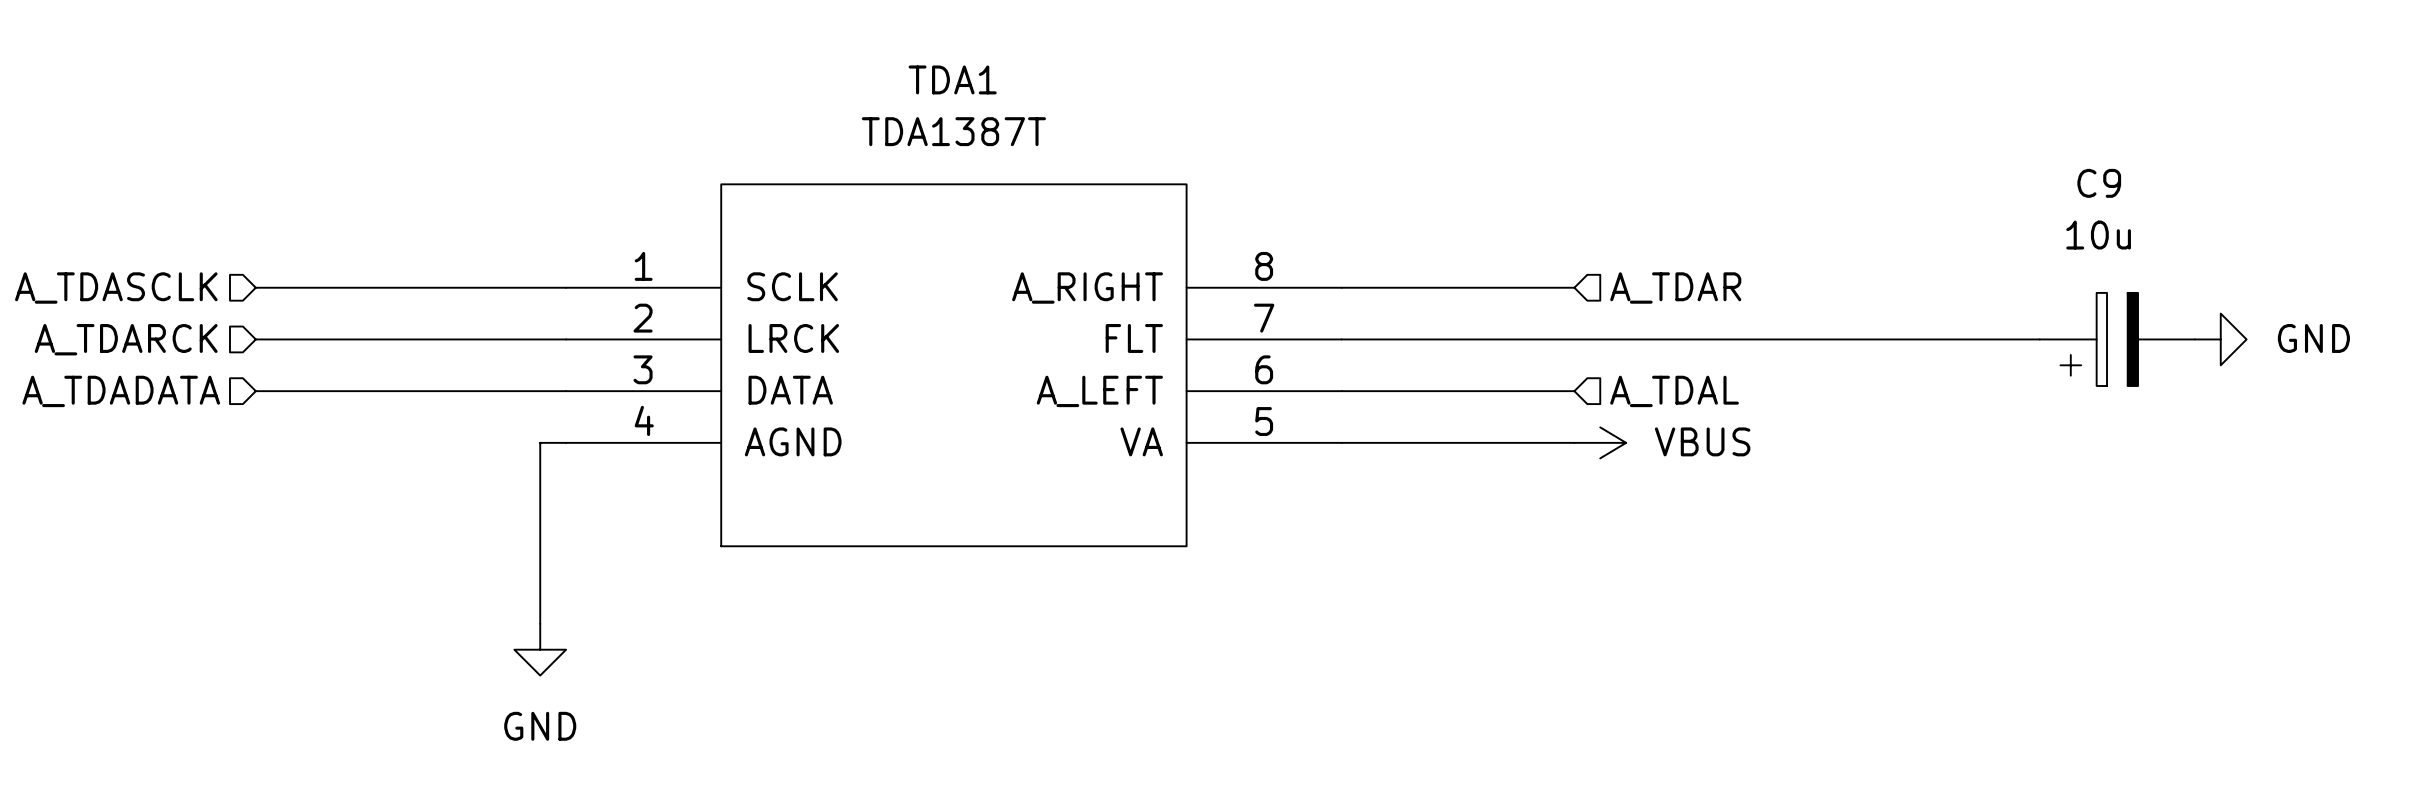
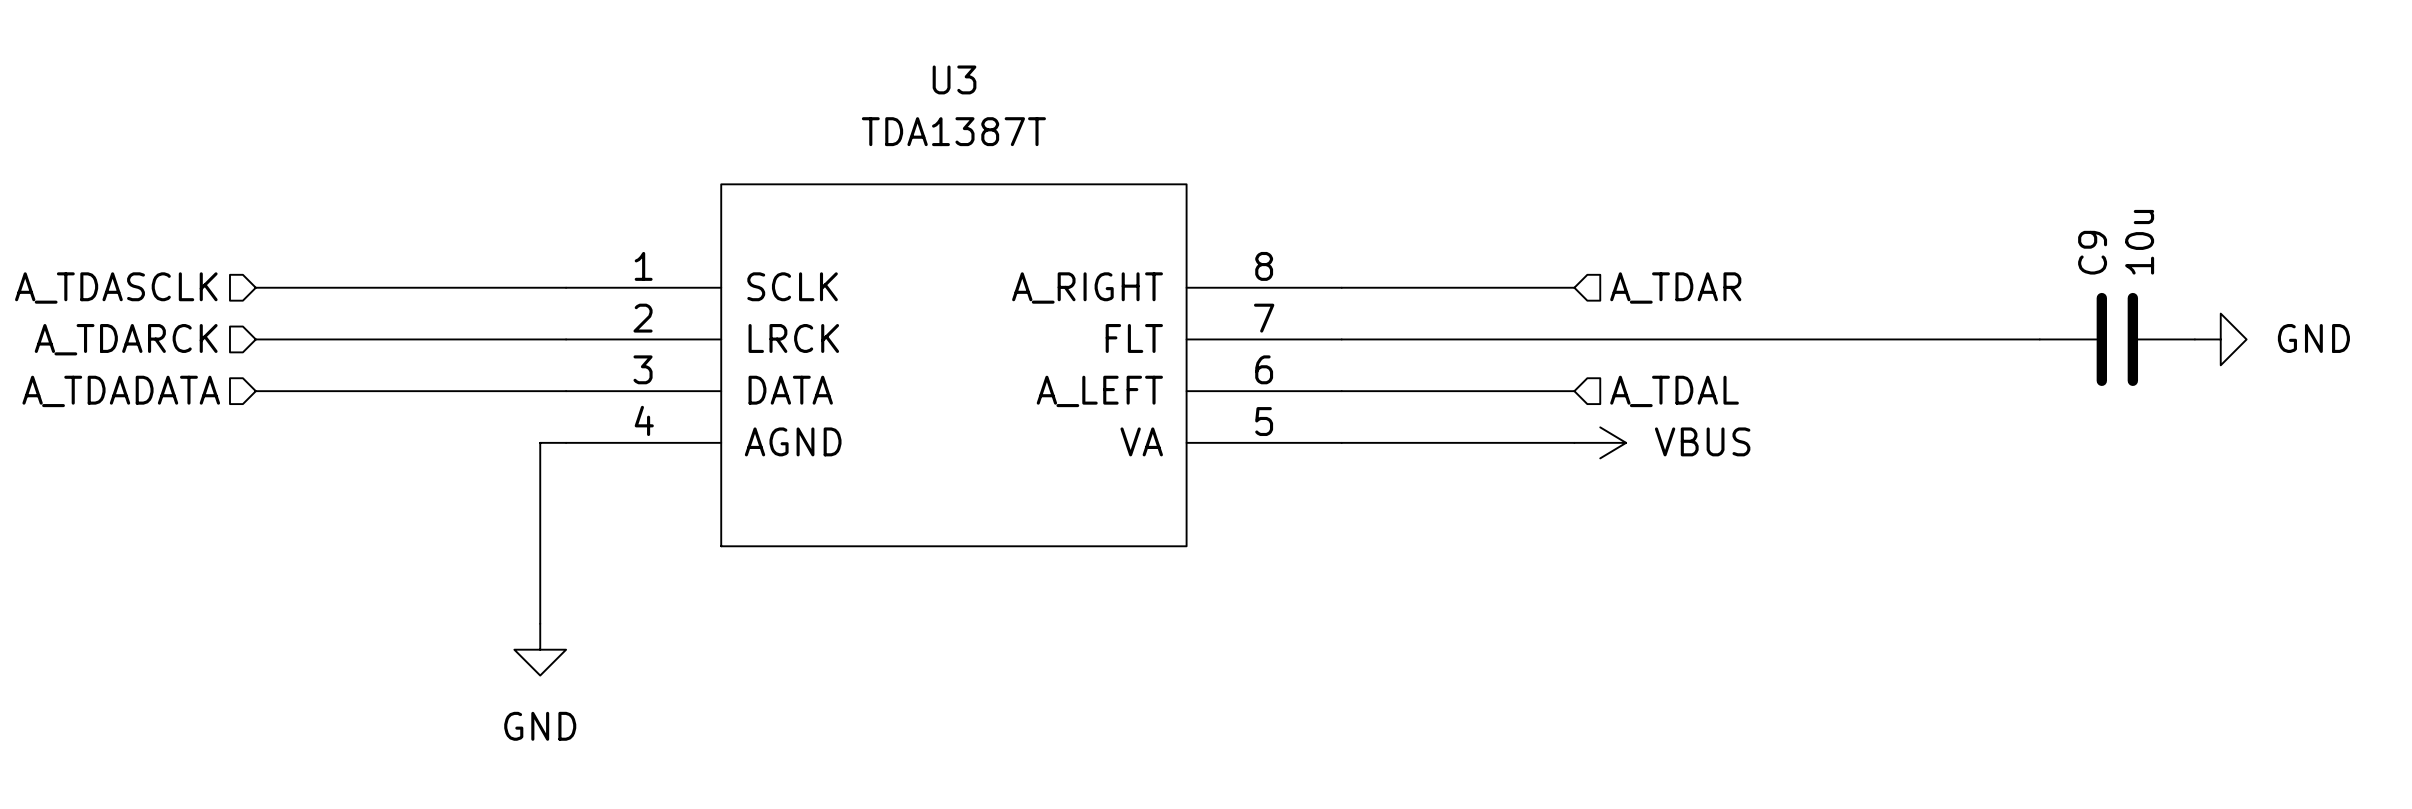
TDA1 name: TDA1 (952, 79) -> U3 (954, 79)
C9 name position: C9 (2099, 183) -> C9 (2092, 252)
C9 value position: 10u (2098, 235) -> 10u (2139, 242)
C9 symbol: [2039, 292, 2195, 386] -> [2039, 292, 2195, 386]

